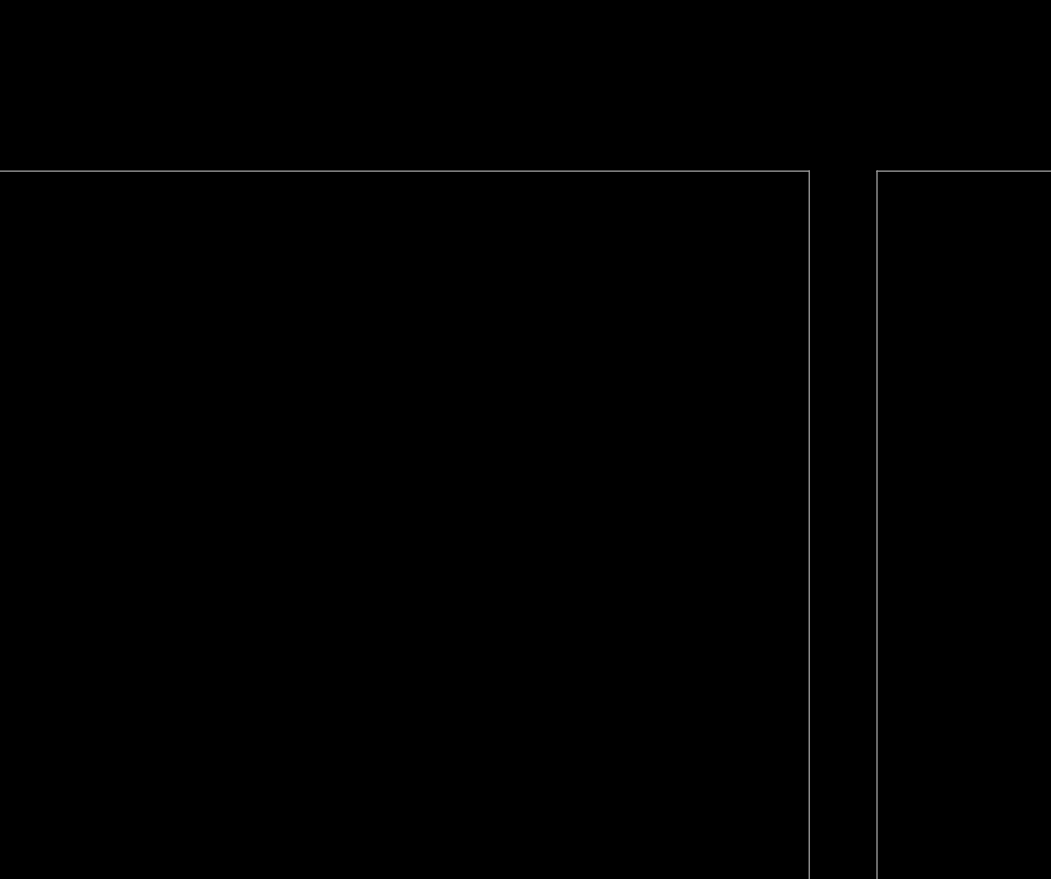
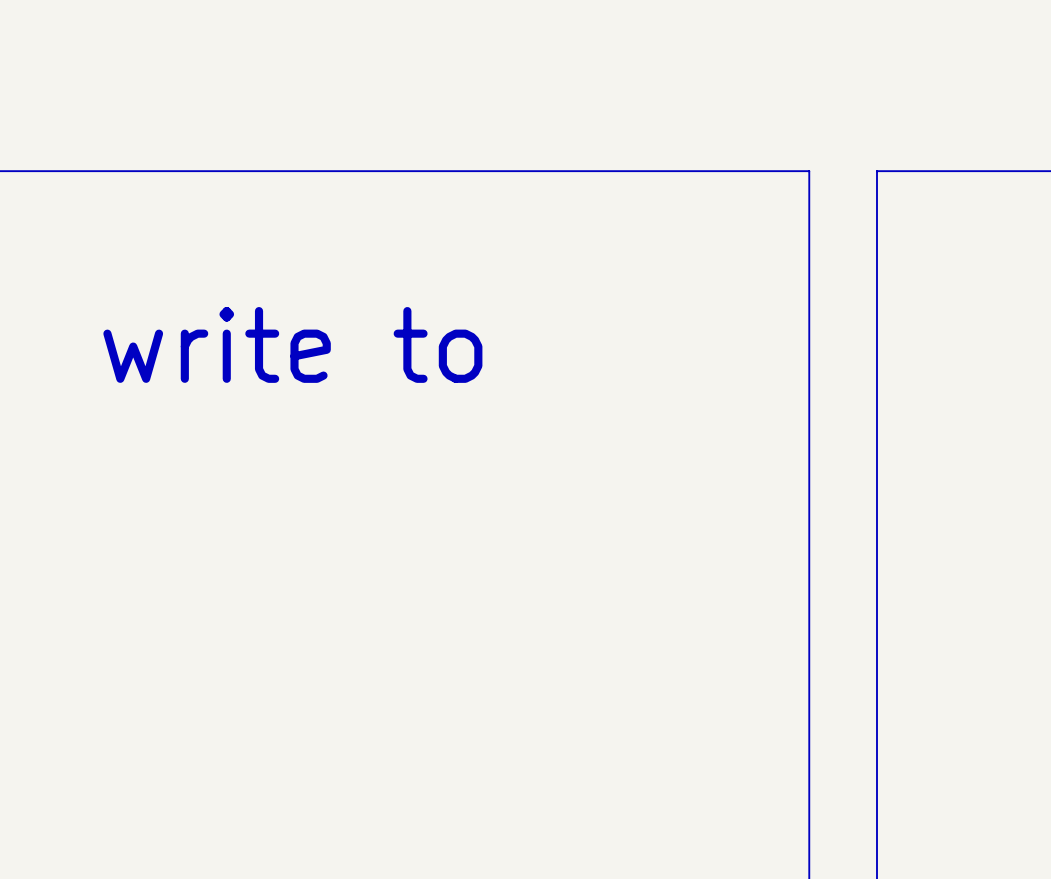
text: none -> write to (292, 344)

